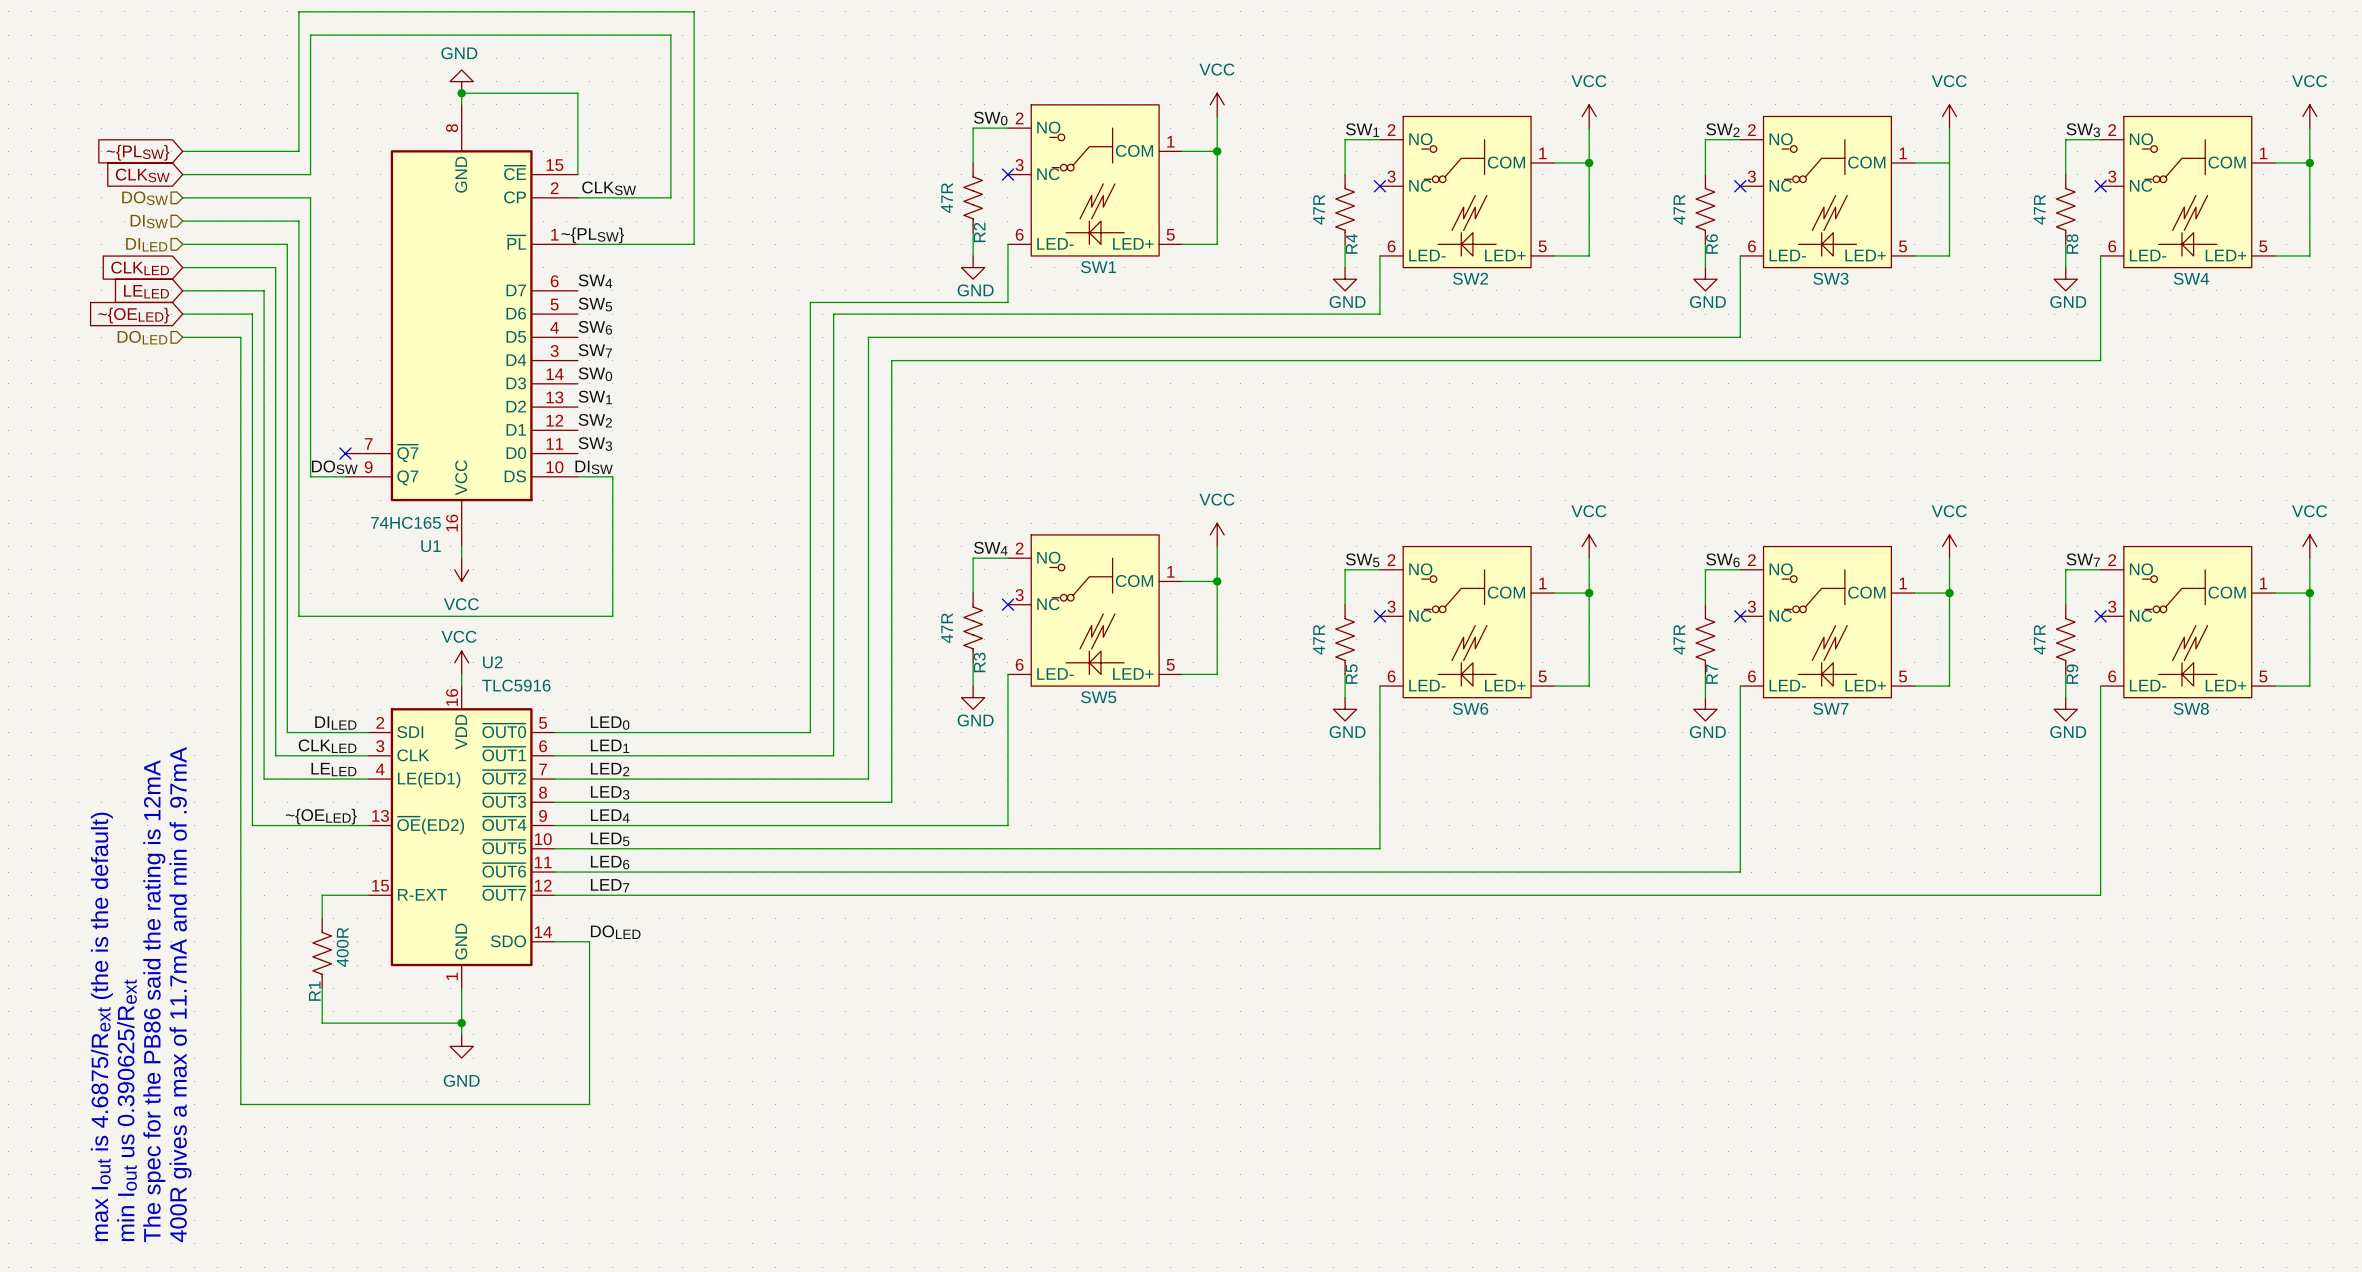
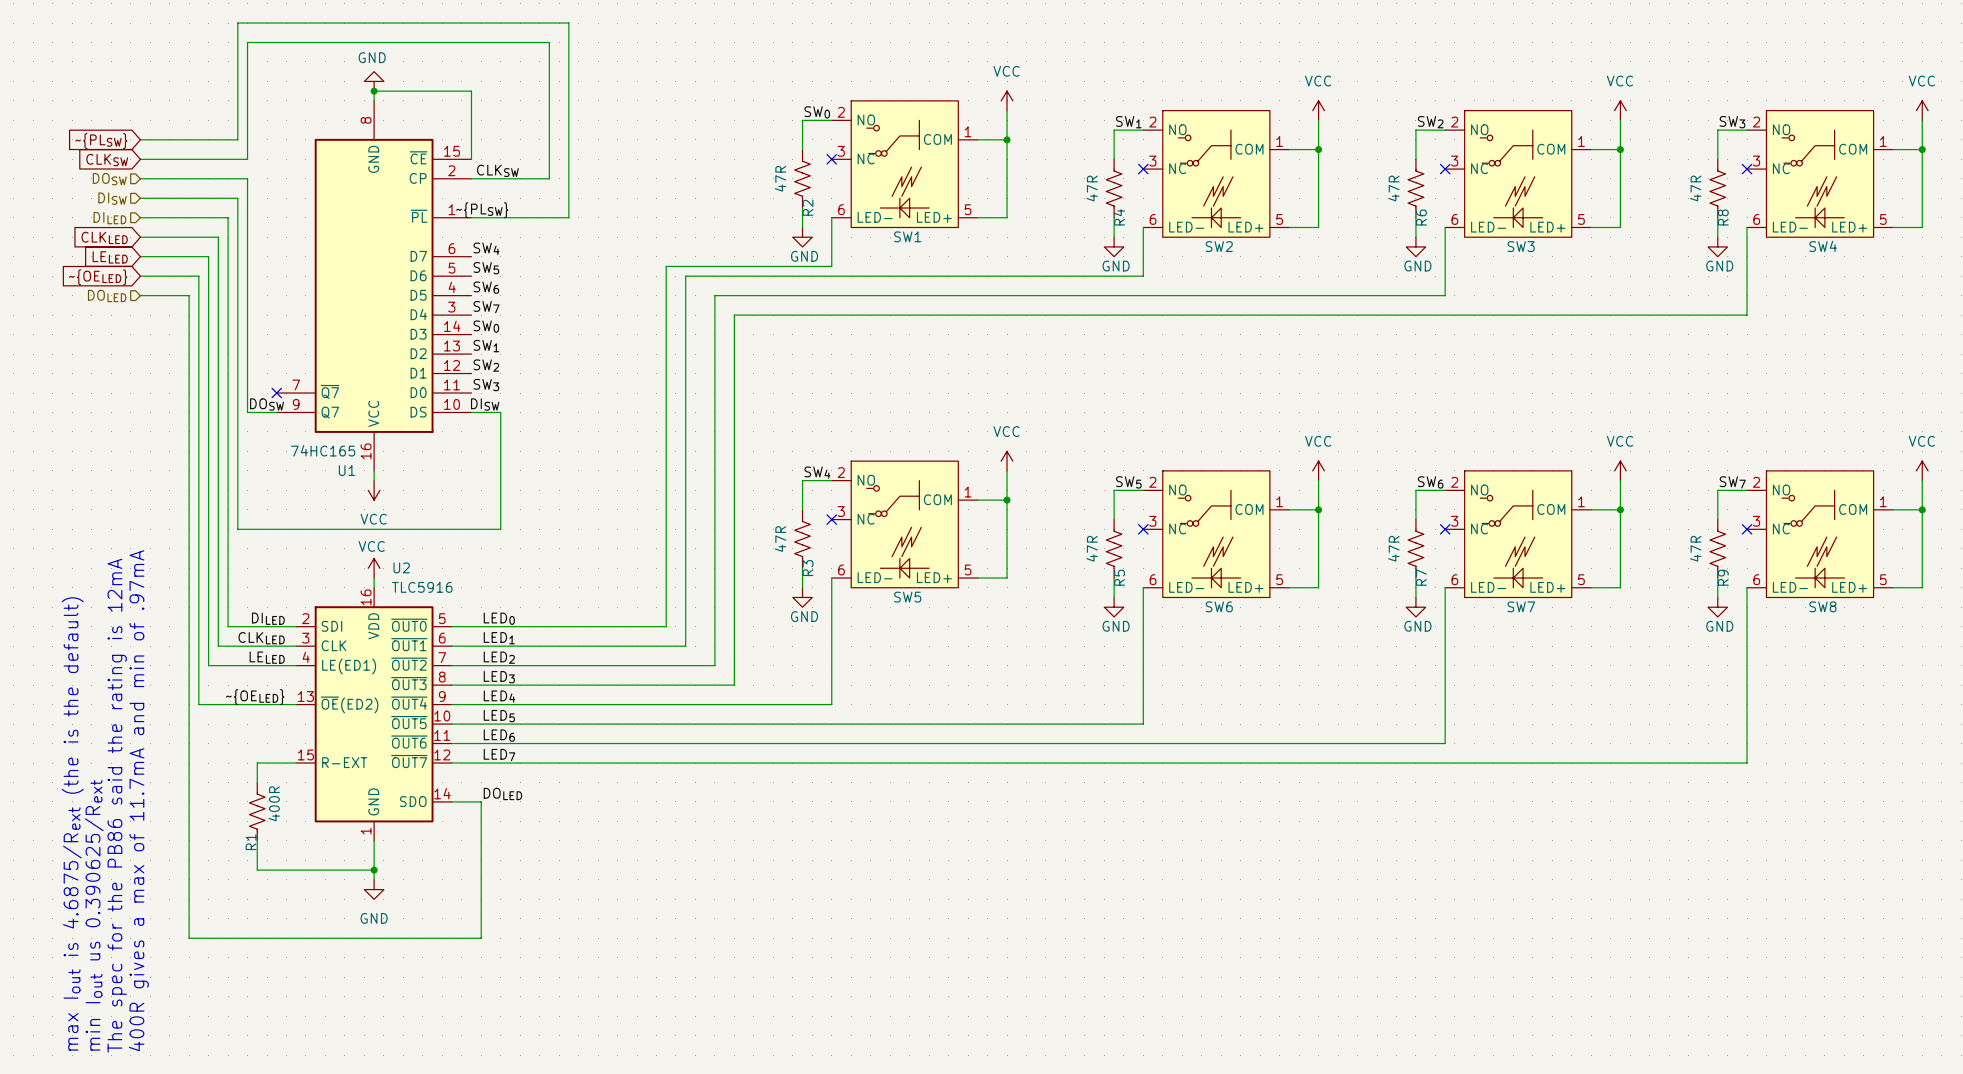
junction: none -> (1620, 149)

